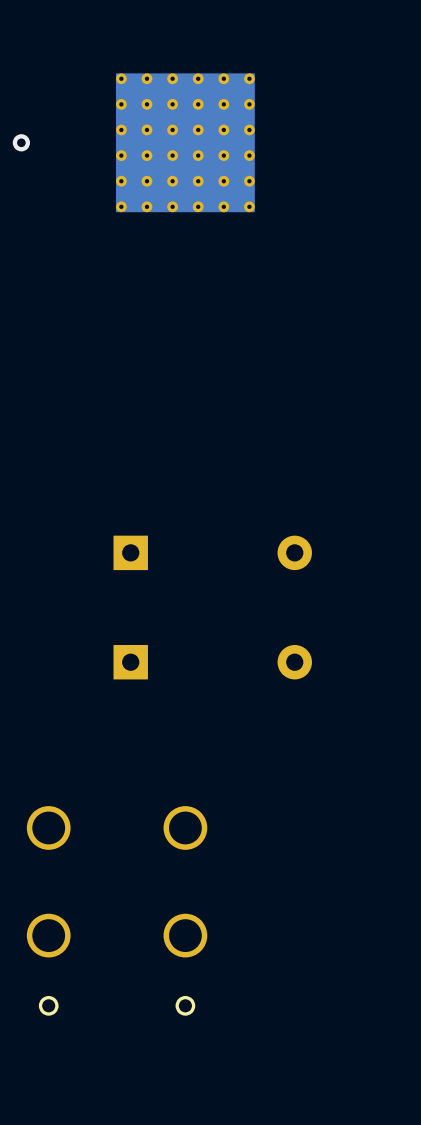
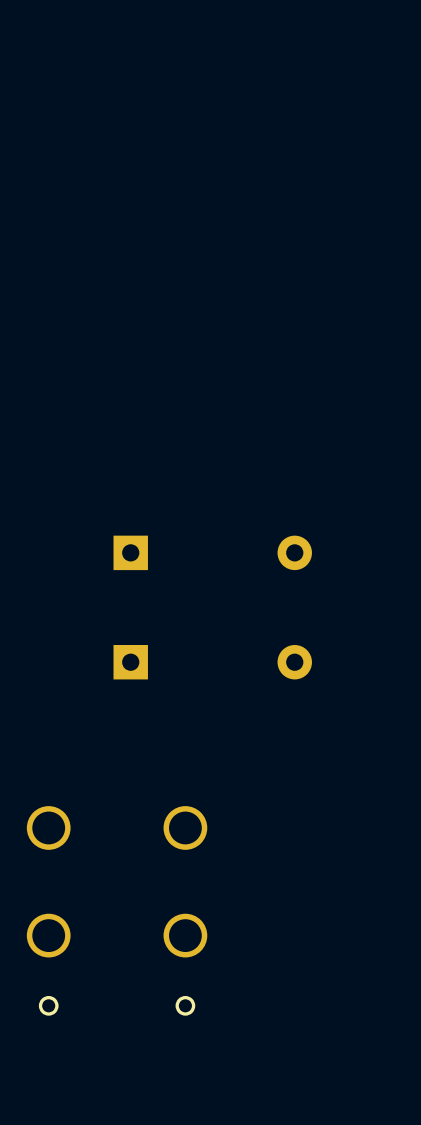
via: (21, 142) -> none
part: (185, 142) -> none

